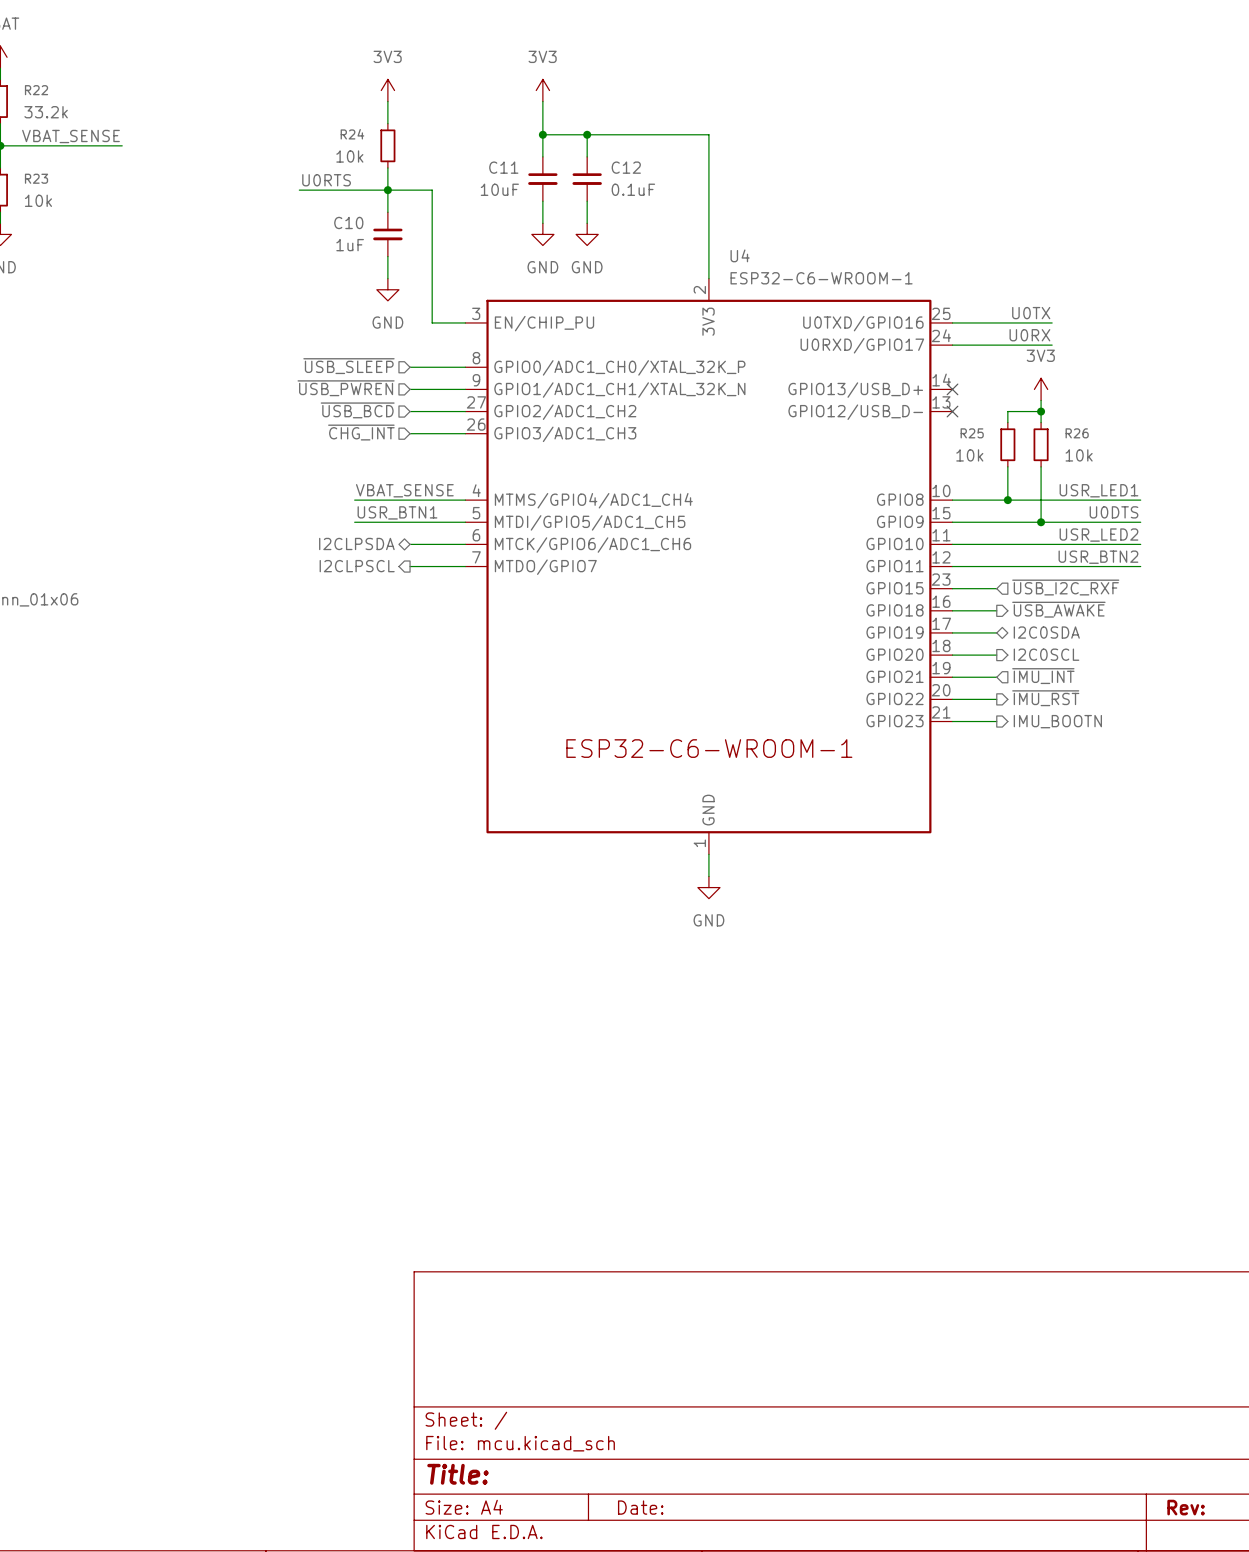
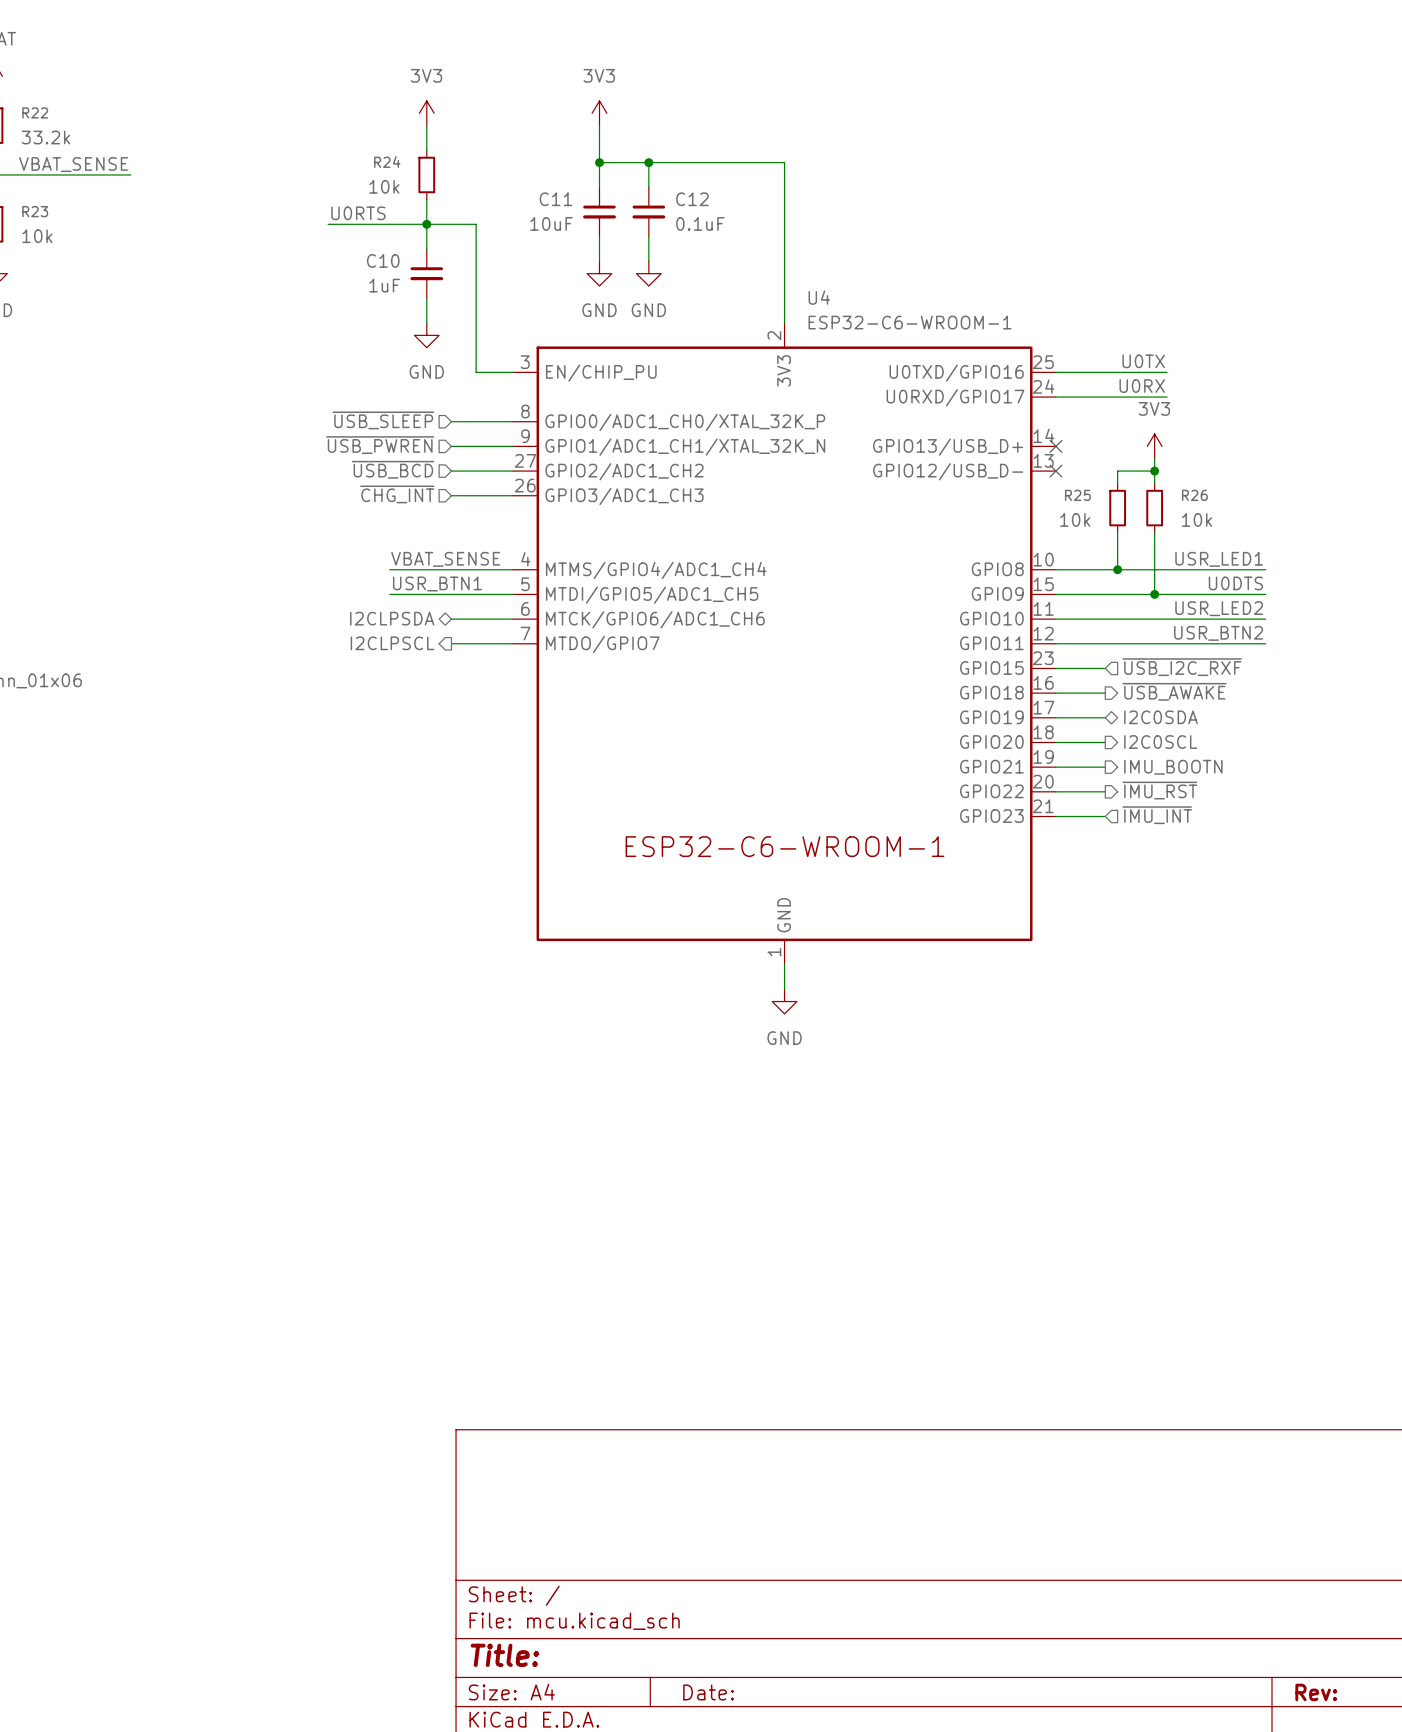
hierarchical label shape: input (1043, 676) -> output (1173, 767)
hierarchical label: ~{IMU_INT} (1043, 676) -> IMU_BOOTN (1173, 767)
hierarchical label shape: output (1057, 721) -> input (1157, 815)
hierarchical label: IMU_BOOTN (1057, 721) -> ~{IMU_INT} (1157, 815)

